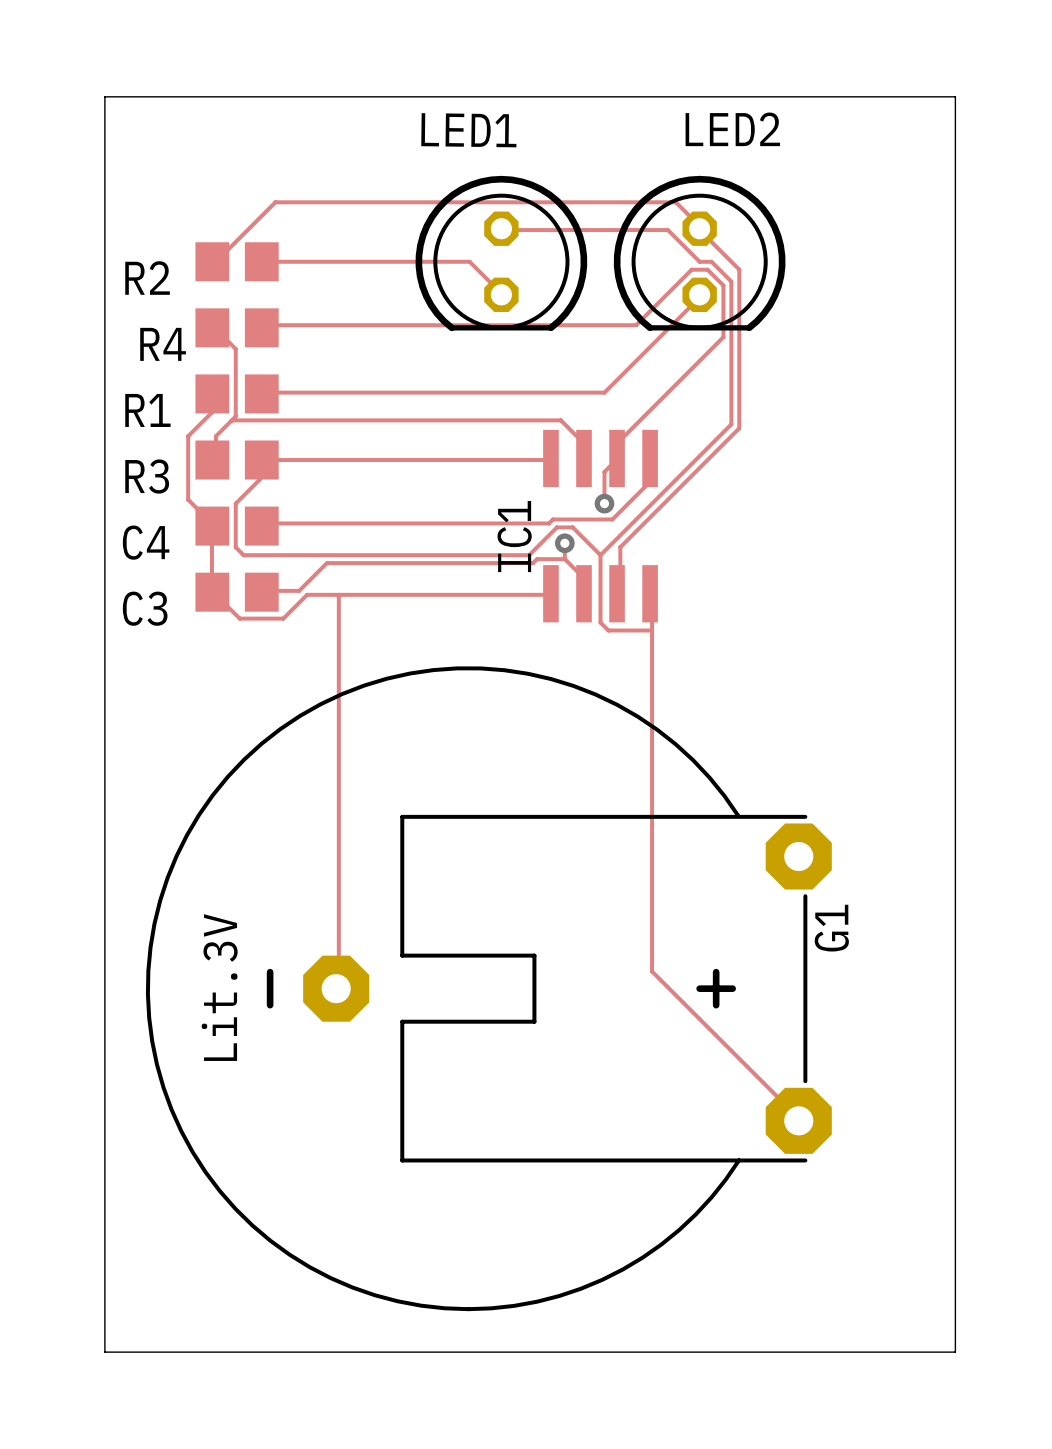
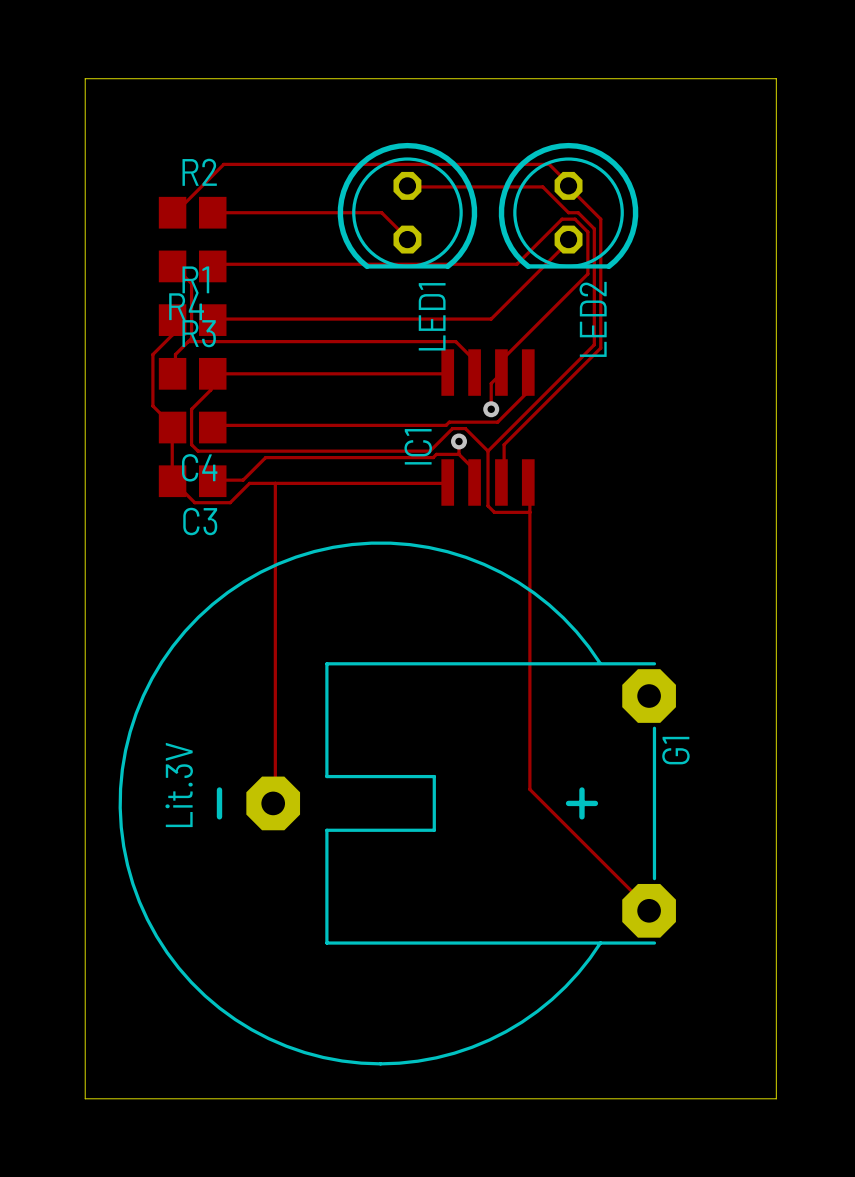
LED2 name rotation: 0° (732, 129) -> 90° counterclockwise (593, 319)
LED2 name position: LED2 (732, 129) -> LED2 (593, 319)
LED1 name rotation: 0° (468, 130) -> 90.7° counterclockwise (432, 316)
LED1 name position: LED1 (468, 130) -> LED1 (432, 316)
R2 name position: R2 (147, 278) -> R2 (199, 172)
R4 name position: R4 (163, 344) -> R4 (186, 306)
R1 name position: R1 (147, 410) -> R1 (195, 279)
R3 name position: R3 (147, 476) -> R3 (199, 333)
C4 name position: C4 (146, 542) -> C4 (199, 467)
C3 name position: C3 (145, 608) -> C3 (200, 521)

